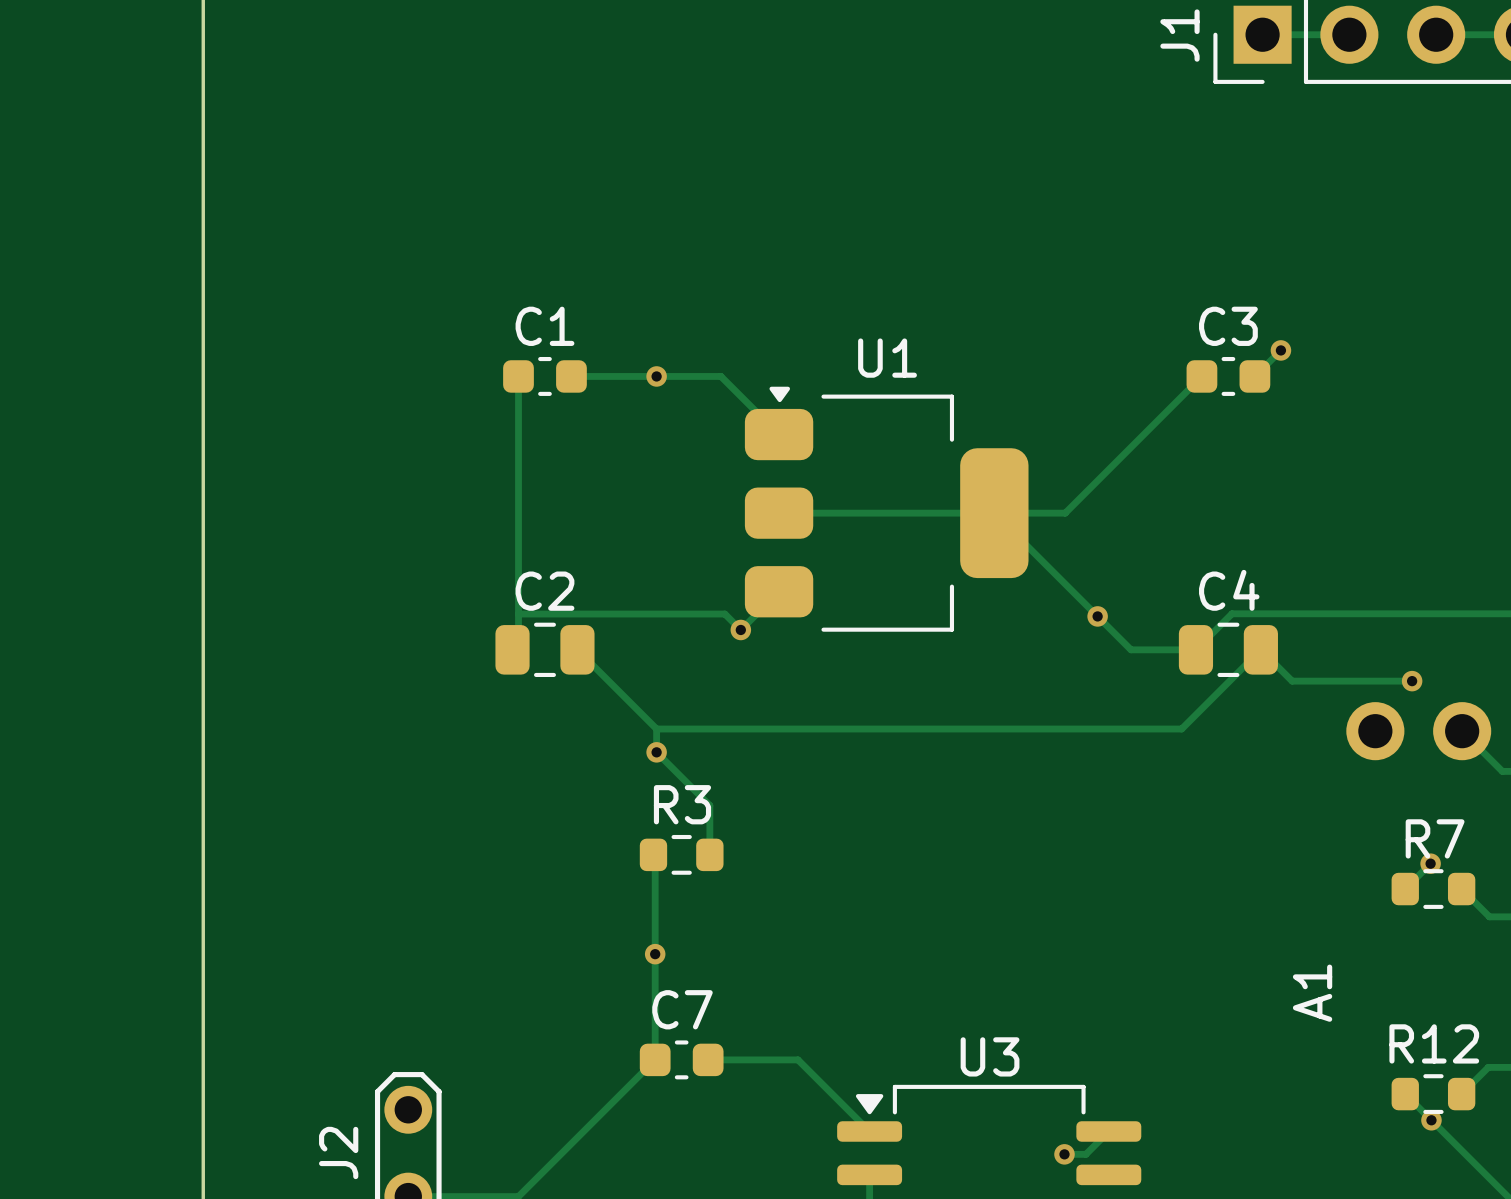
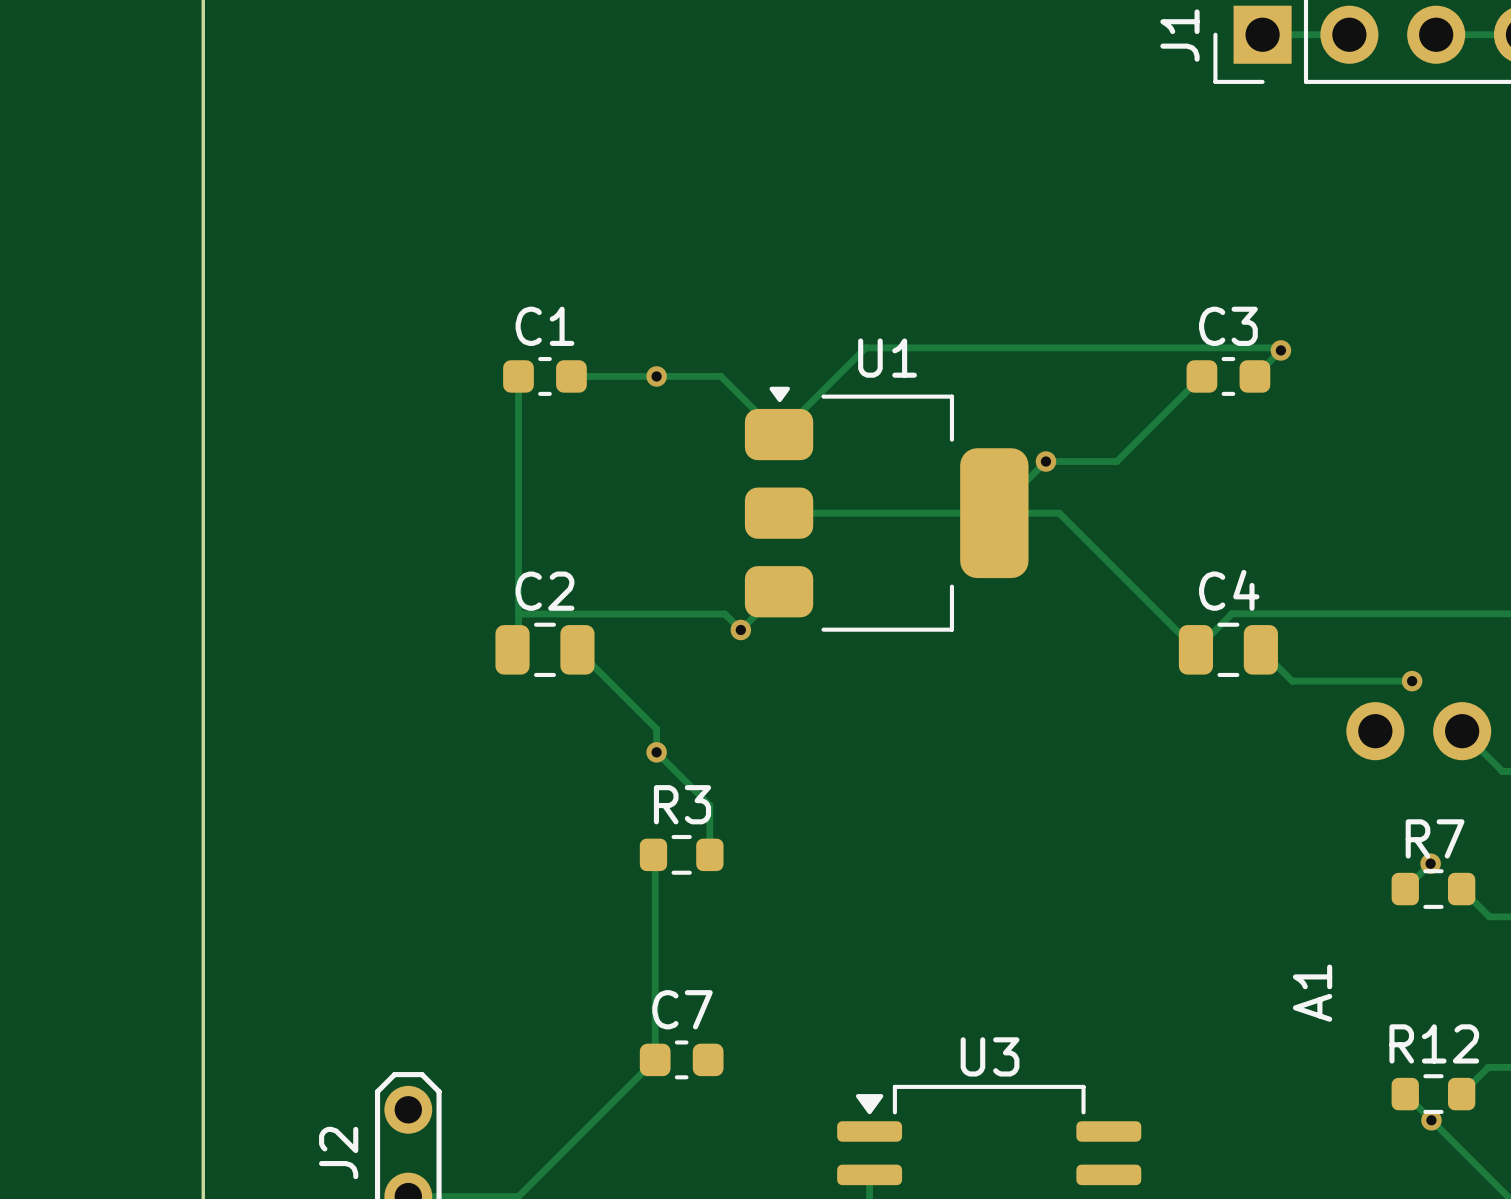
track: none -> (1280, 350) (1278, 347) (865, 347) (779, 434)
track: (1116, 461) (1065, 513) (1059, 513) -> (1116, 461) (1045, 461) (994, 513)
track: (994, 513) (1131, 649) (1195, 649) -> (1059, 513) (1195, 649)
via position: (1097, 616) -> (1045, 461)
track: (1260, 649) (1181, 729) (656, 729) -> none
via: (655, 954) -> none
track: (708, 1059) (798, 1059) (869, 1131) -> none
track: (1108, 1131) (1085, 1154) (1064, 1154) -> none
via: (1064, 1154) -> none

